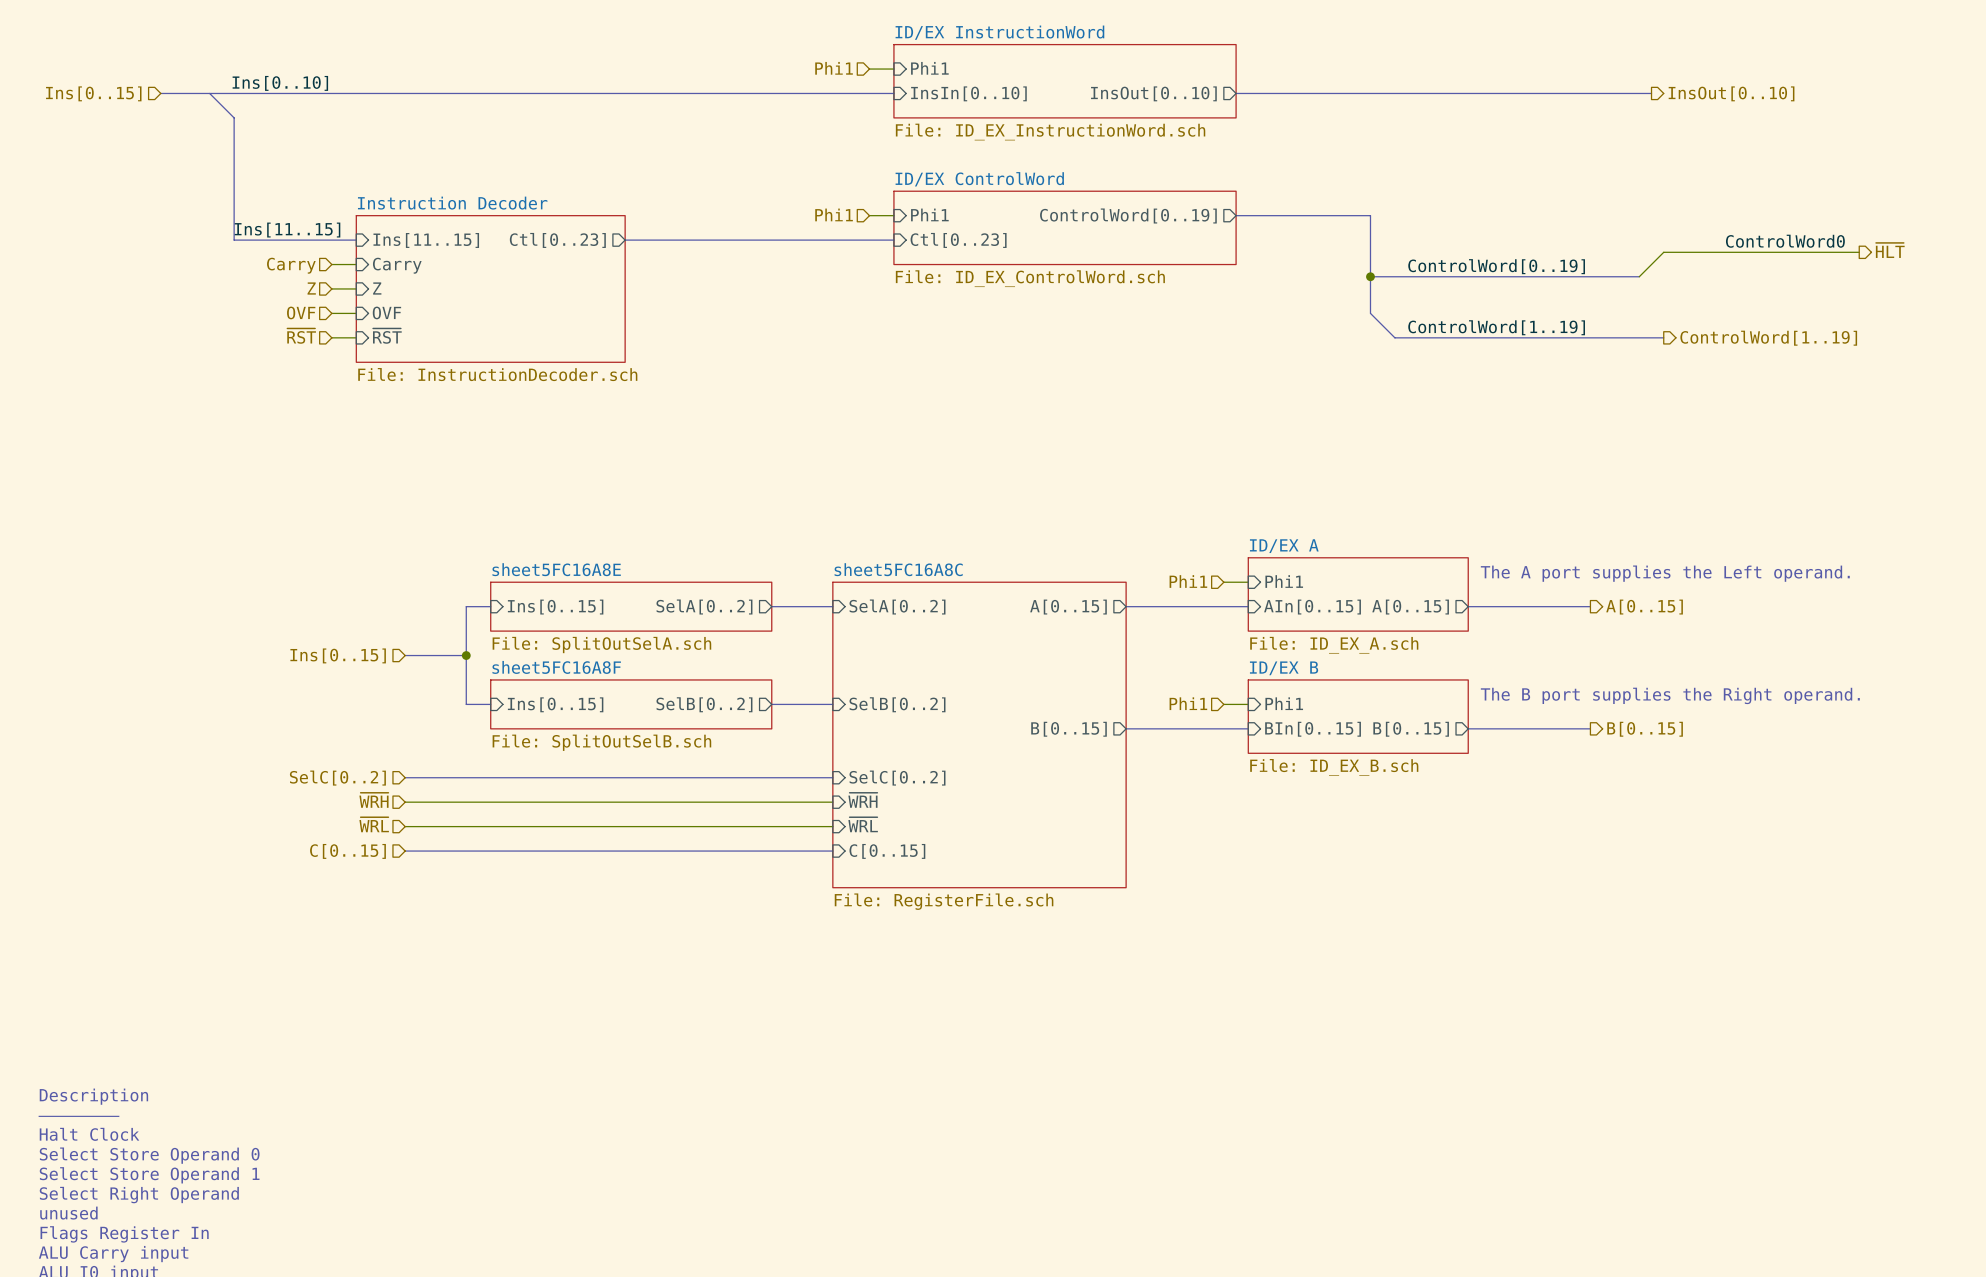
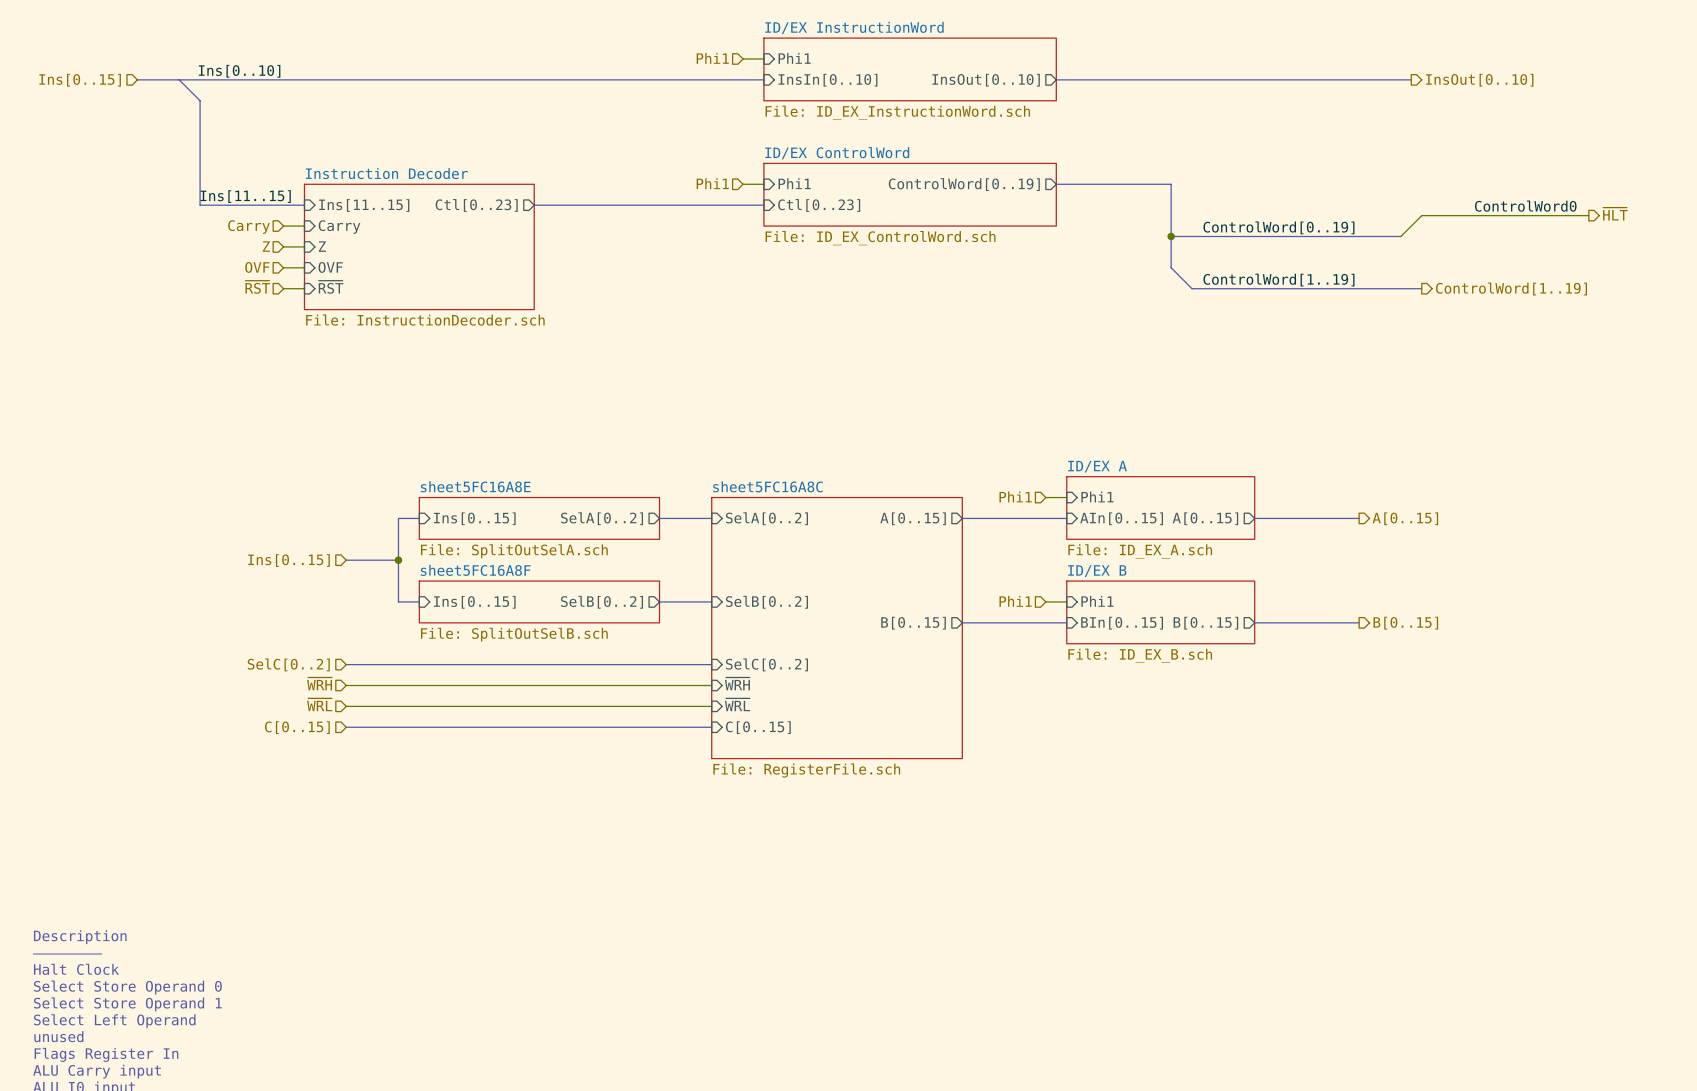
text: The A port supplies the Left operand. (1665, 573) -> none
text: The B port supplies the Right operand. (1670, 695) -> none
text: Select Right Operand (139, 1195) -> Select Left Operand (114, 1021)

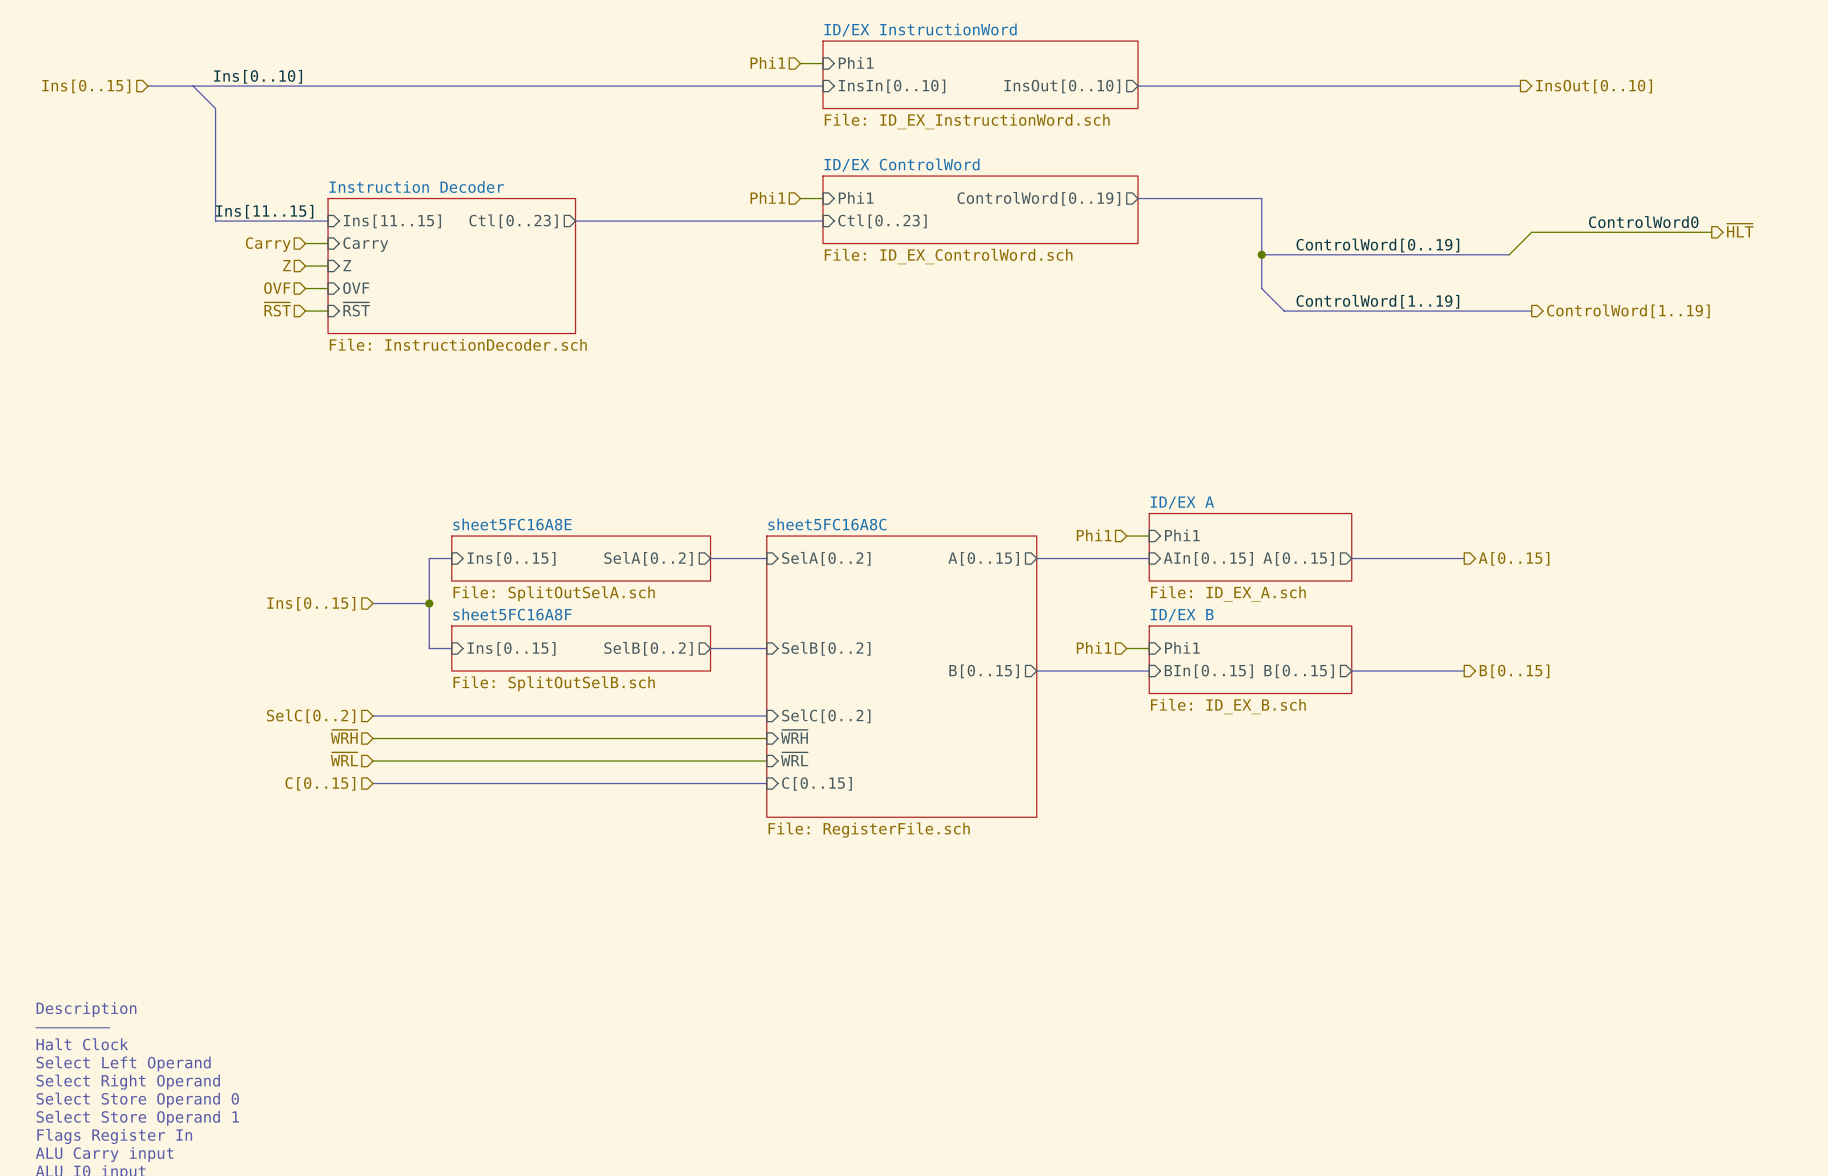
text: Select Store Operand 0 (127, 987) -> Select Left Operand (123, 1063)
text: Select Store Operand 1 (127, 1004) -> Select Right Operand (128, 1082)
text: Select Left Operand (114, 1021) -> Select Store Operand 0 (137, 1100)
text: unused (58, 1036) -> Select Store Operand 1 (137, 1118)

